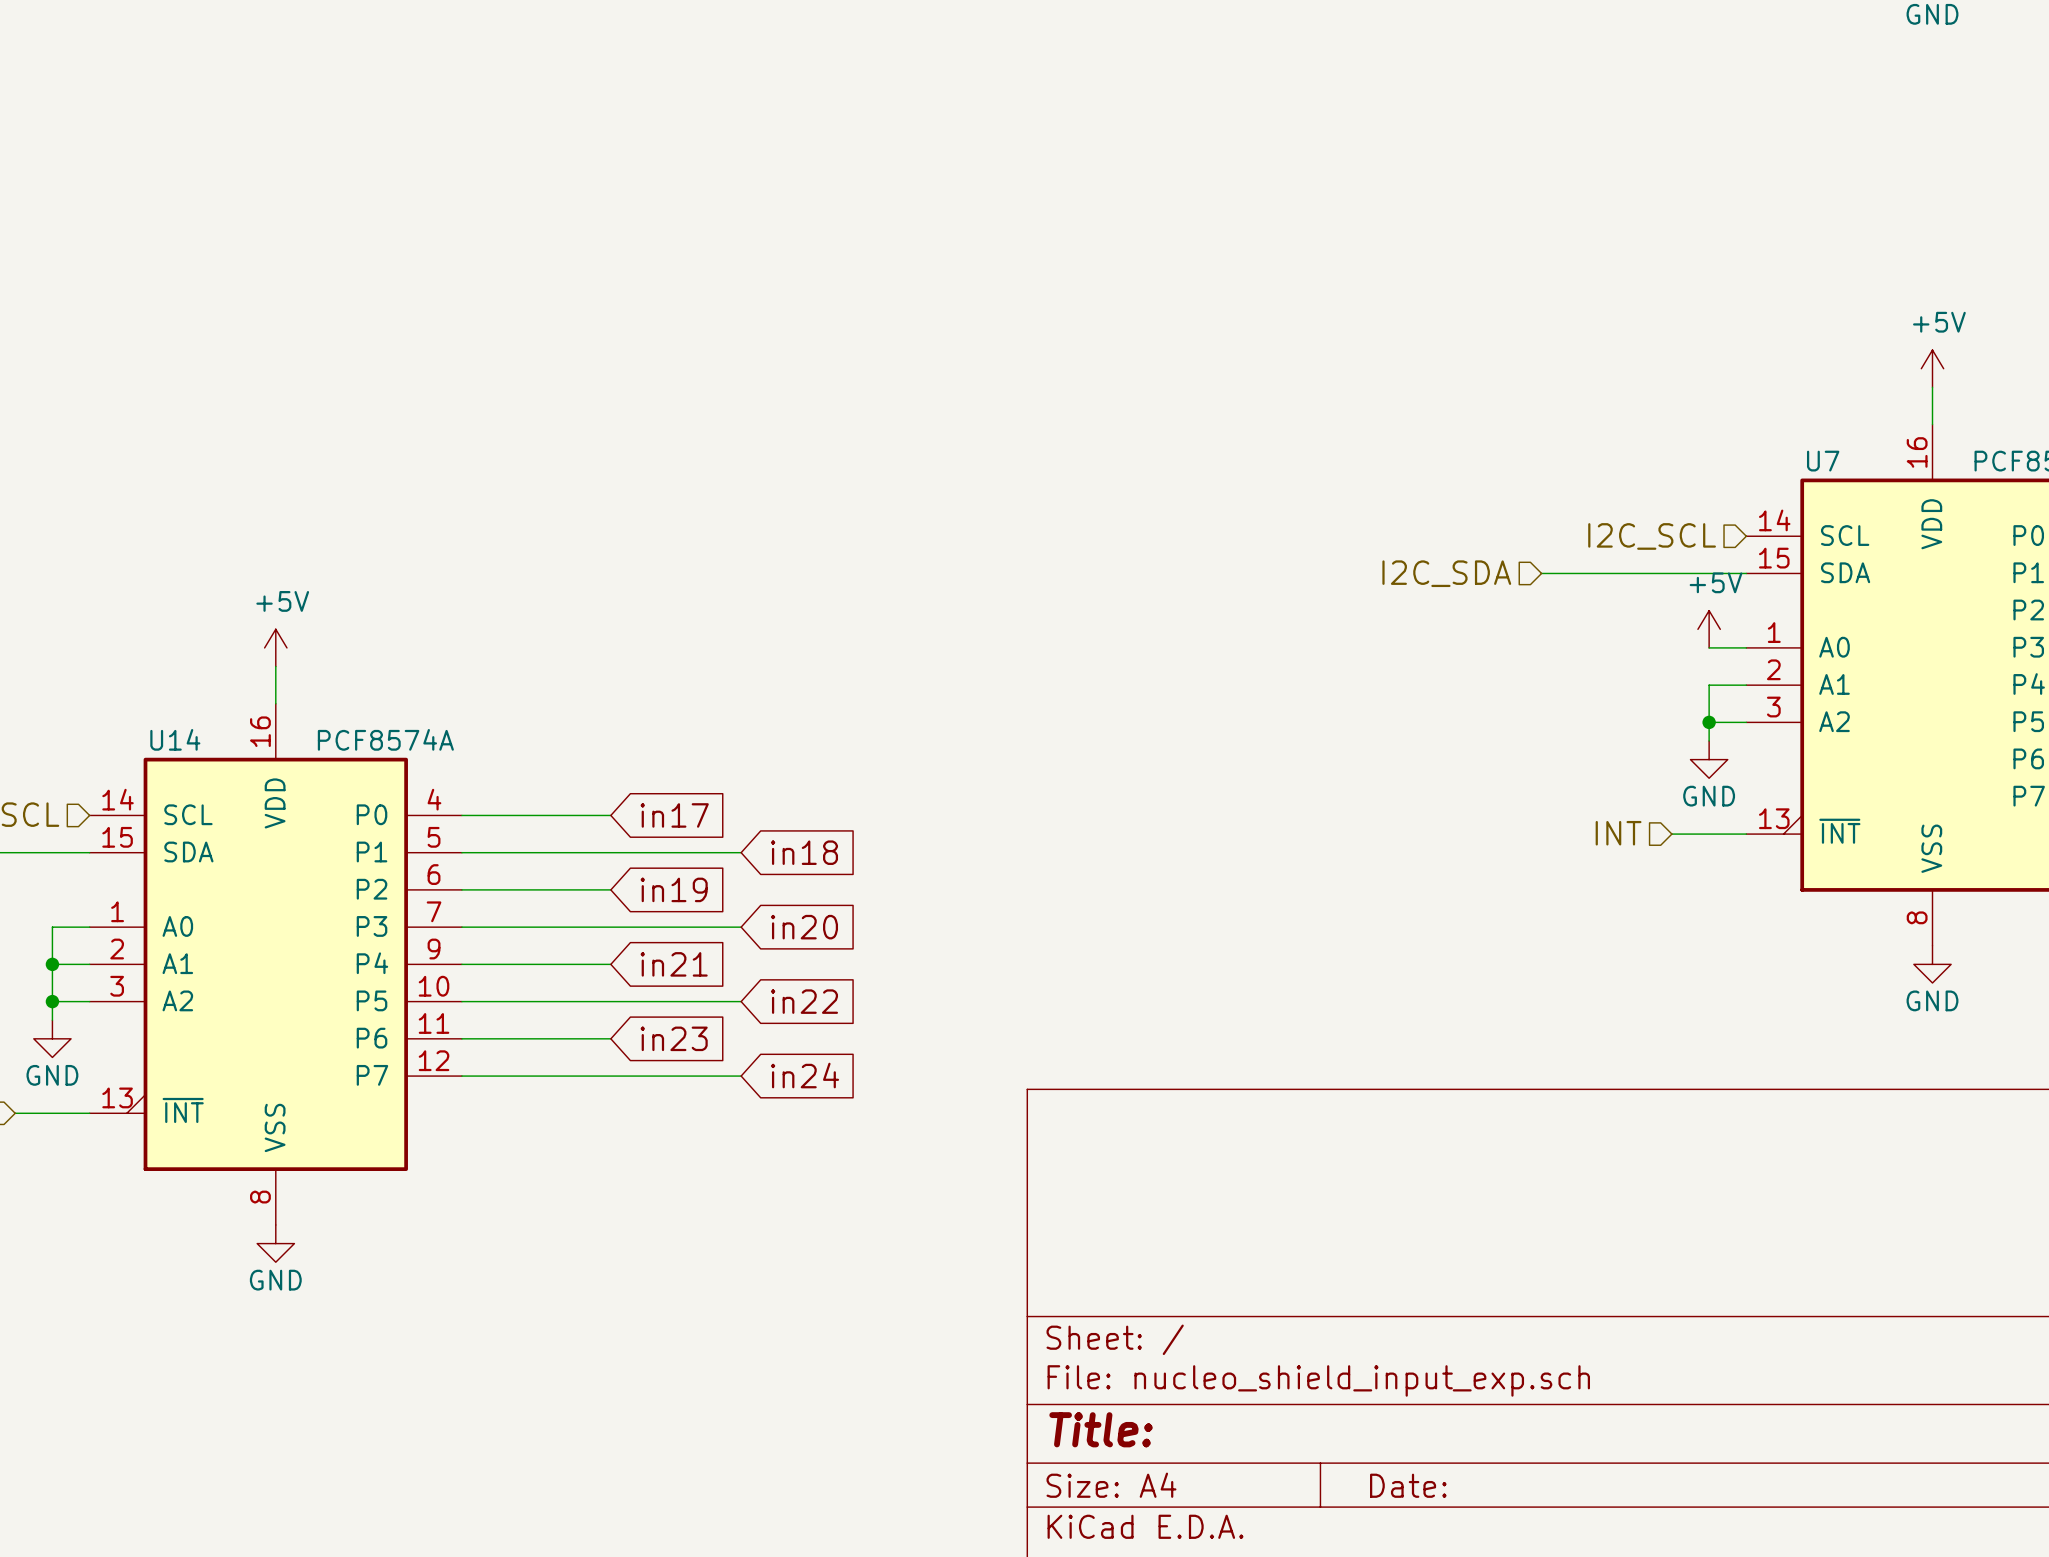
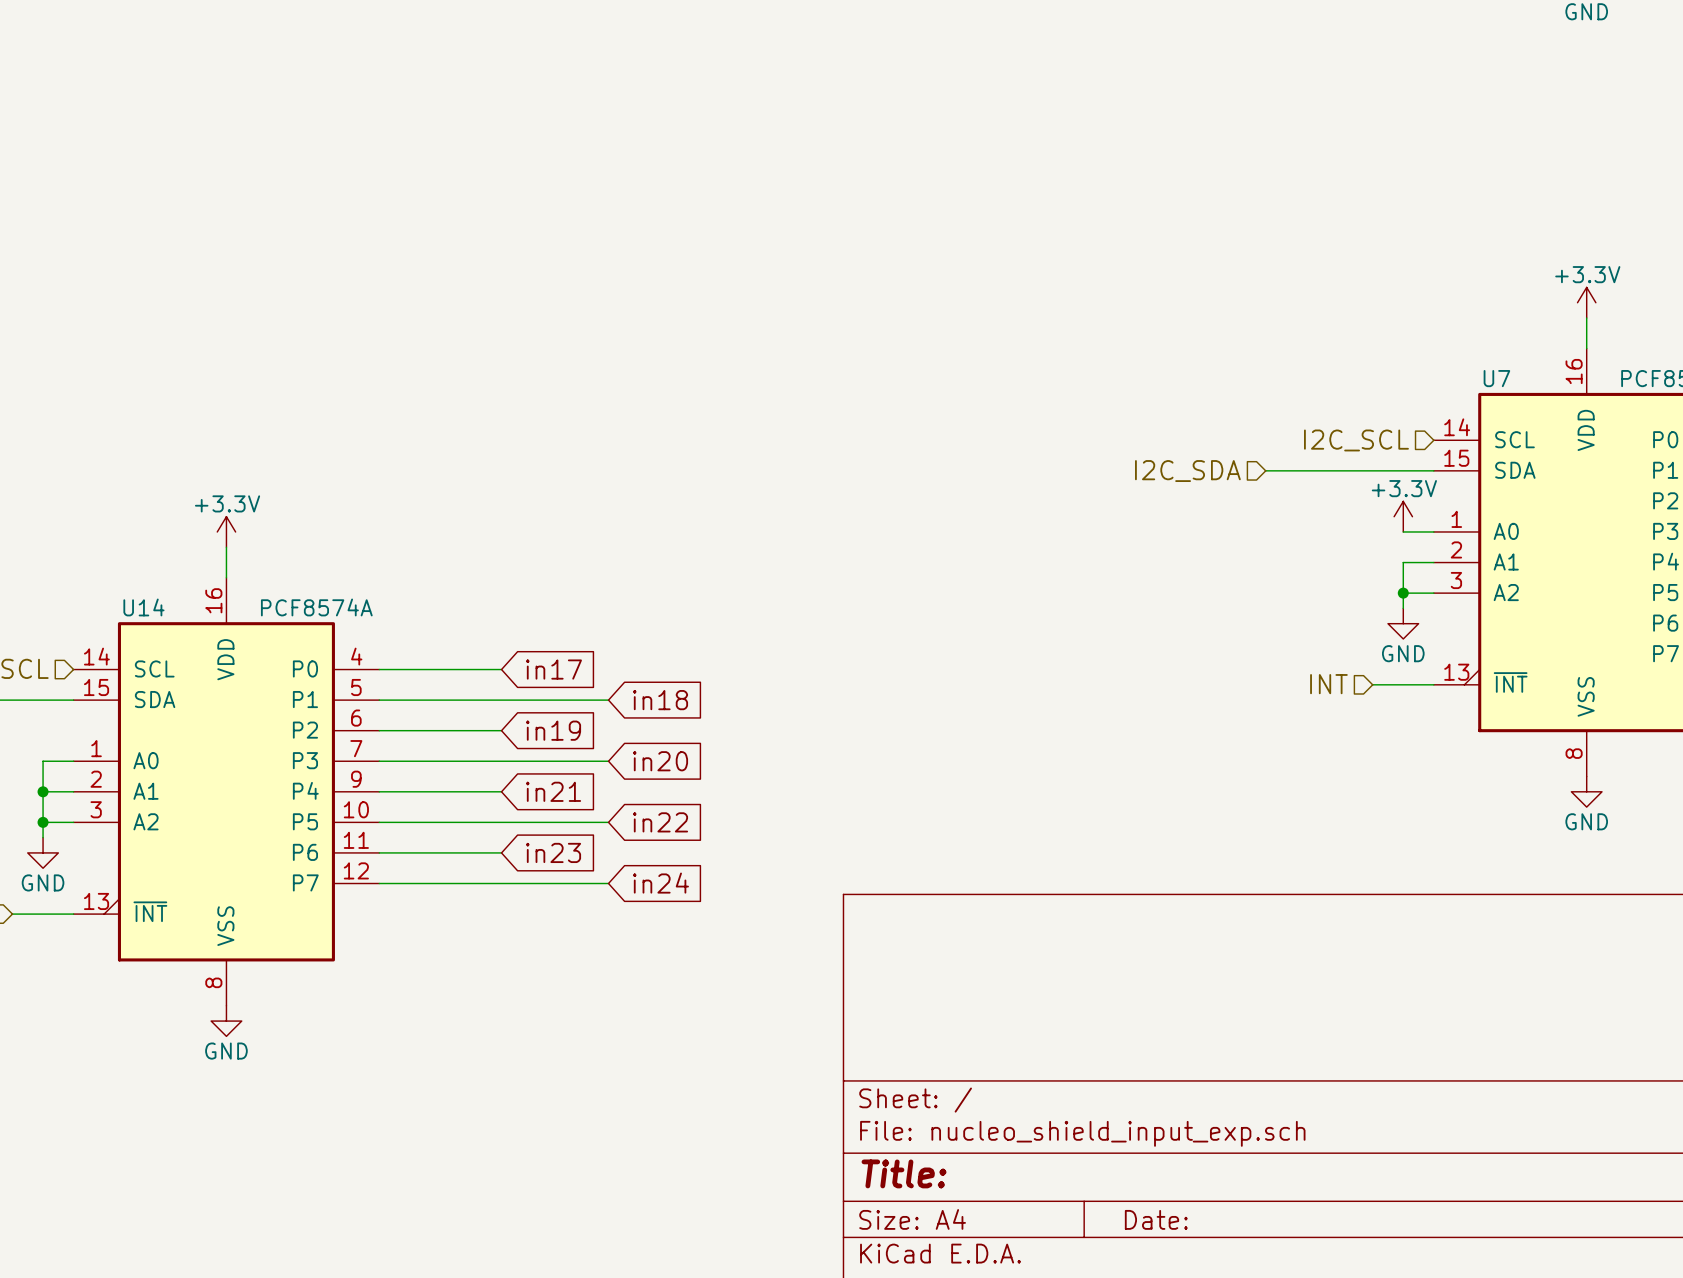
power symbol: +5V (1932, 368) -> +3.3V (1586, 302)
power symbol: +5V (1709, 629) -> +3.3V (1403, 516)
power symbol: +5V (275, 647) -> +3.3V (226, 531)

